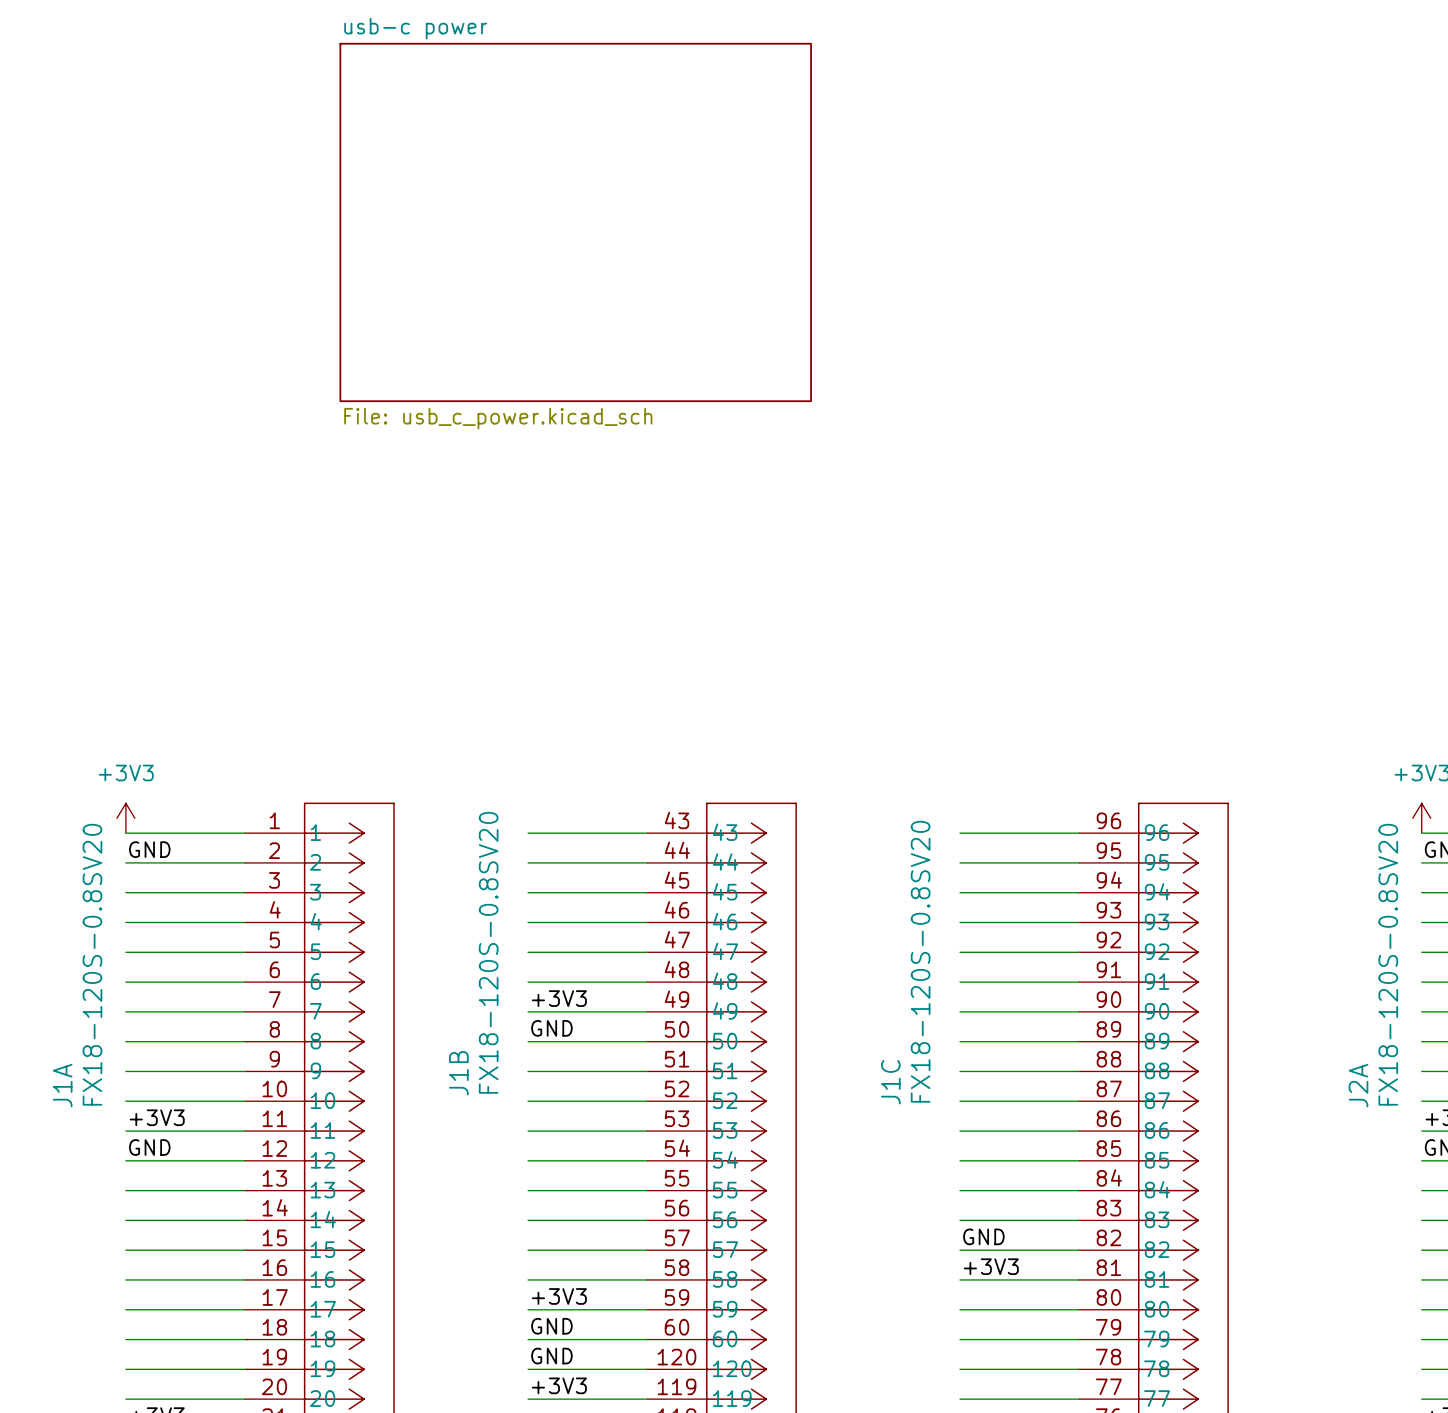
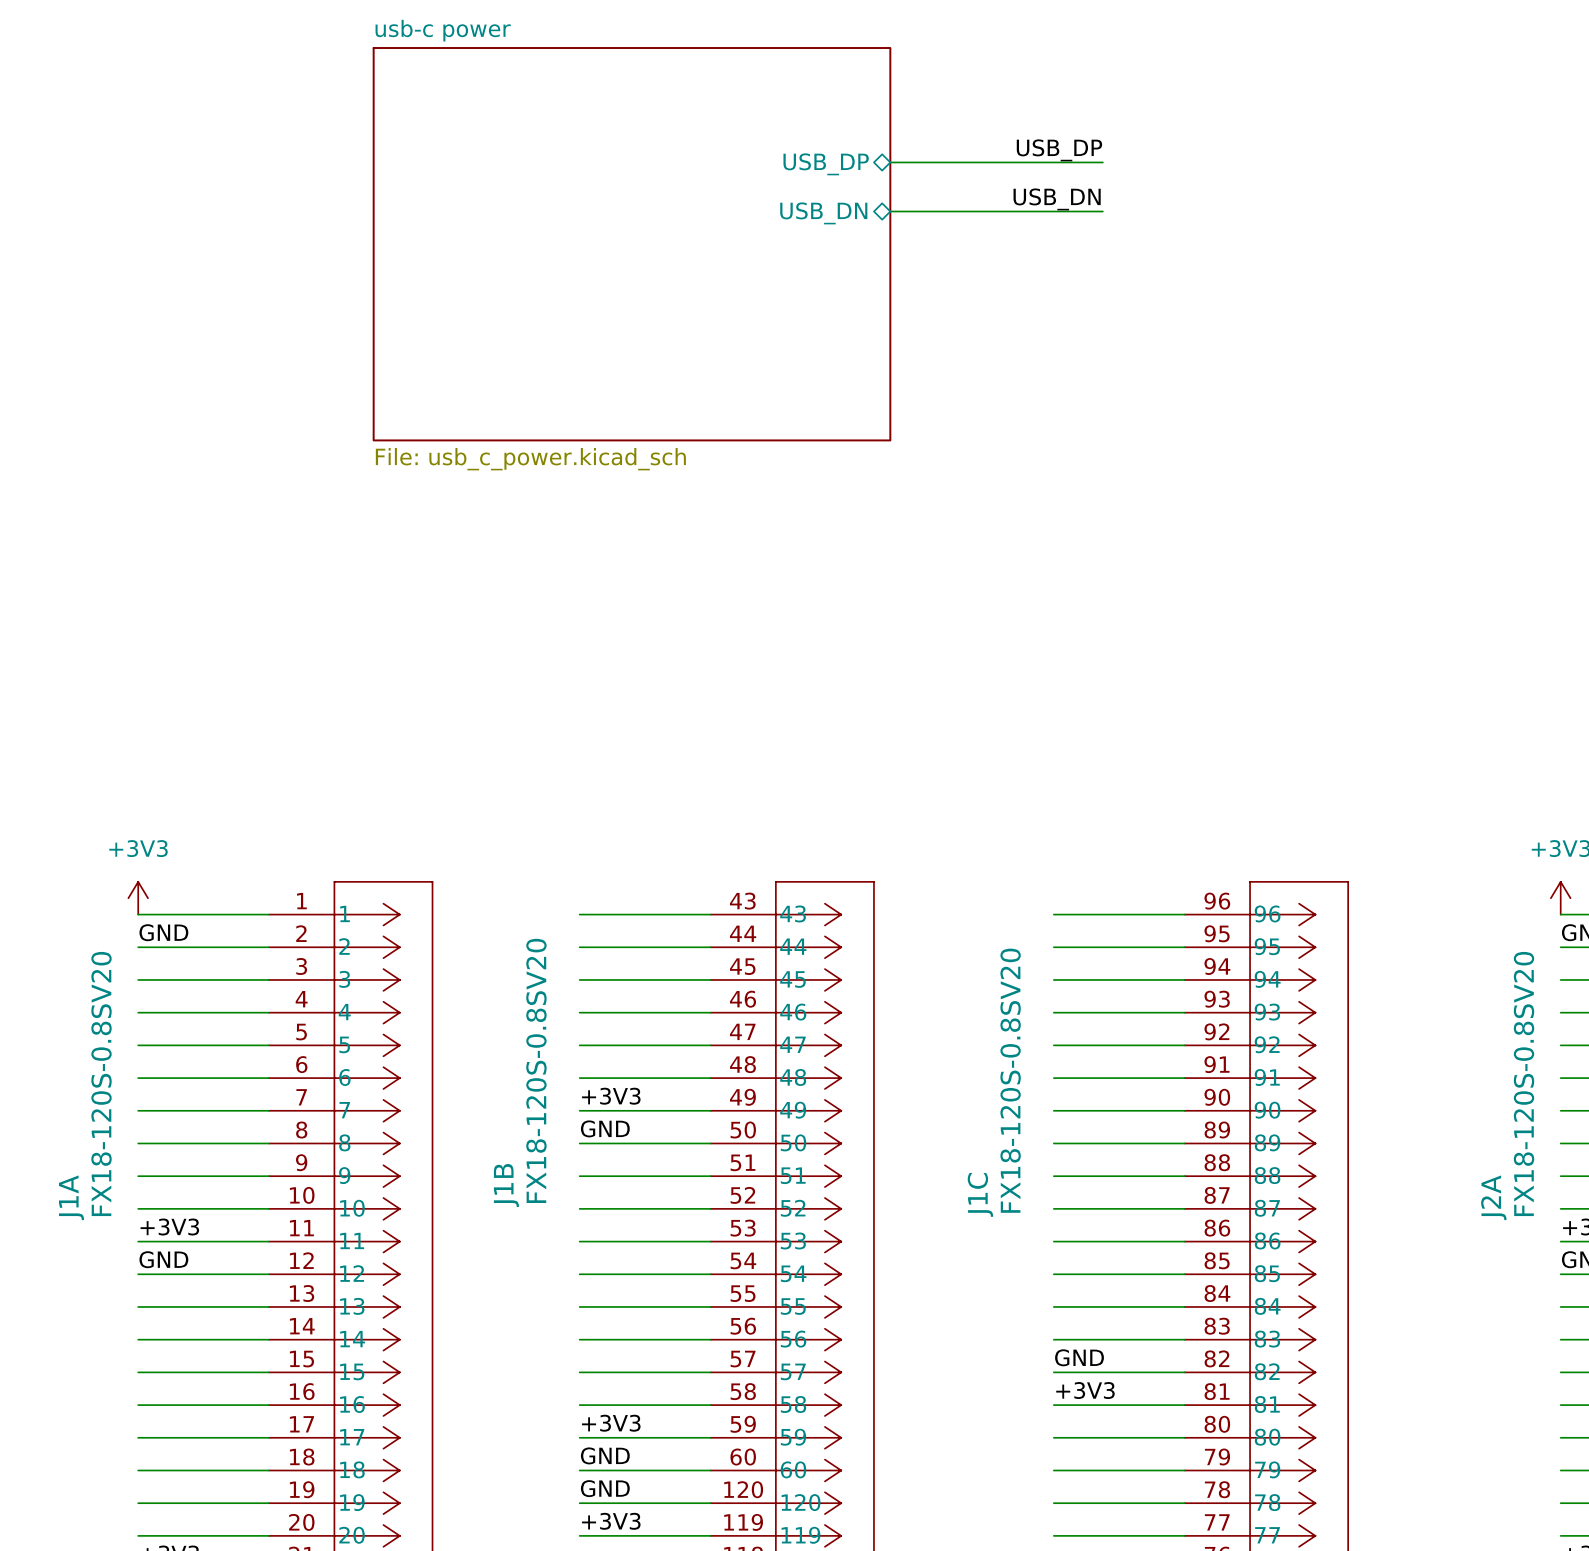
label: none -> USB_DP (1059, 150)
wire: none -> (890, 162) (1102, 162)
sheet pin: none -> USB_DP (826, 164)
label: none -> USB_DN (1057, 199)
sheet pin: none -> USB_DN (823, 213)
wire: none -> (890, 211) (1102, 211)

